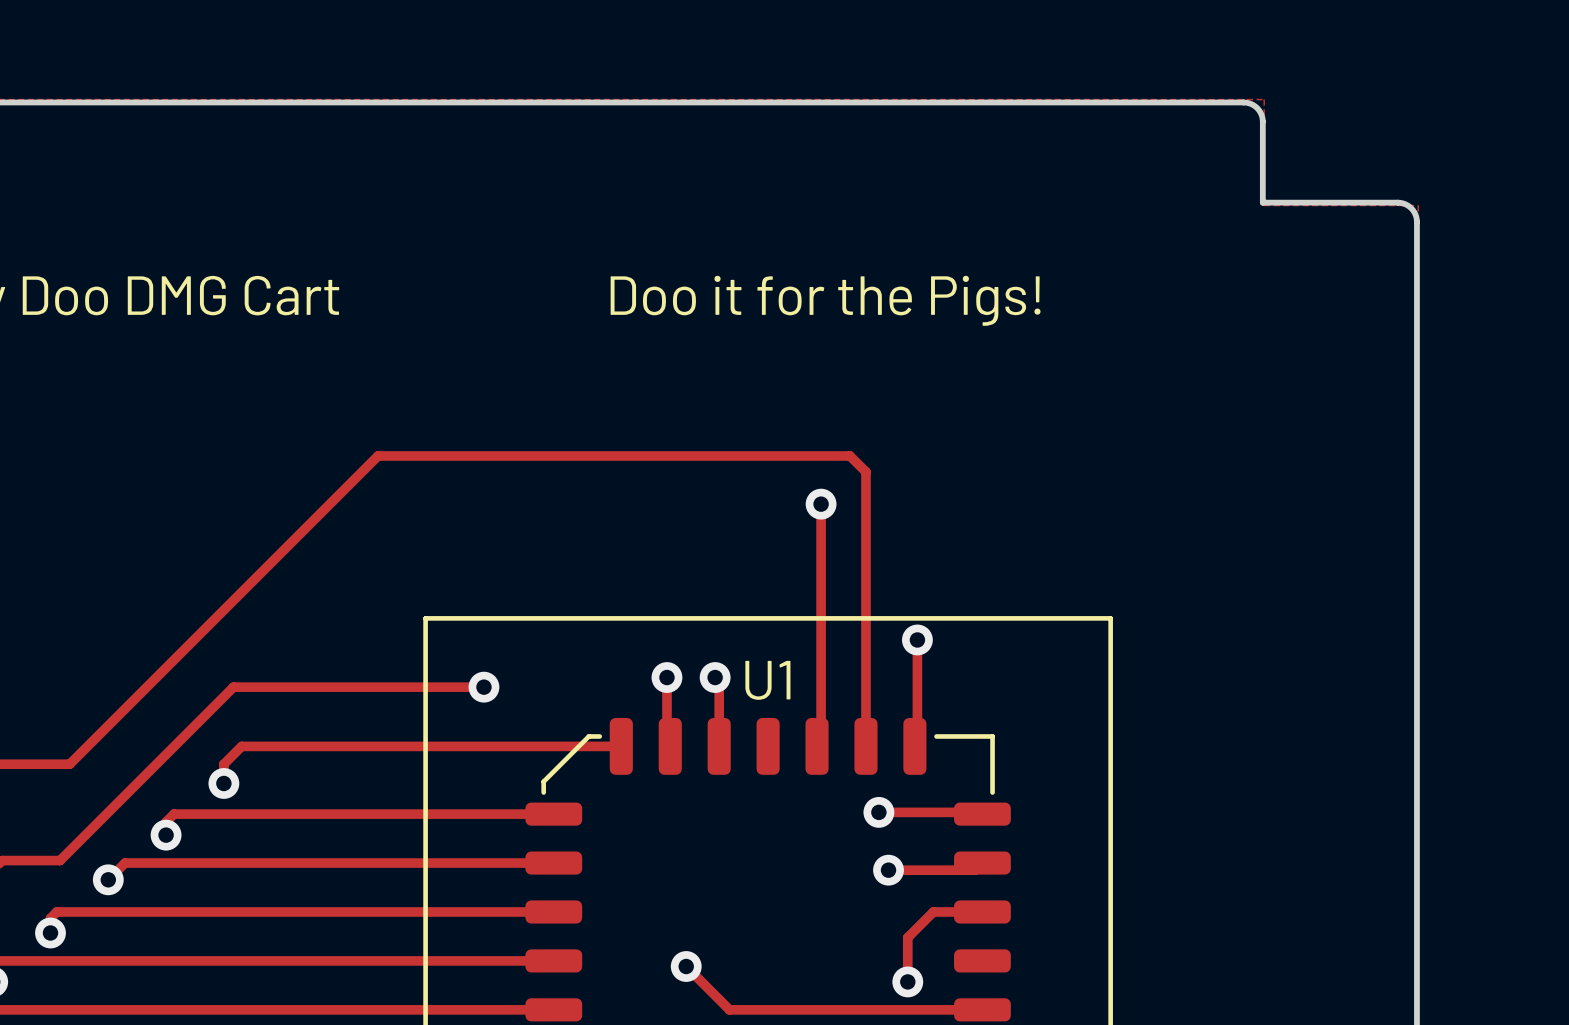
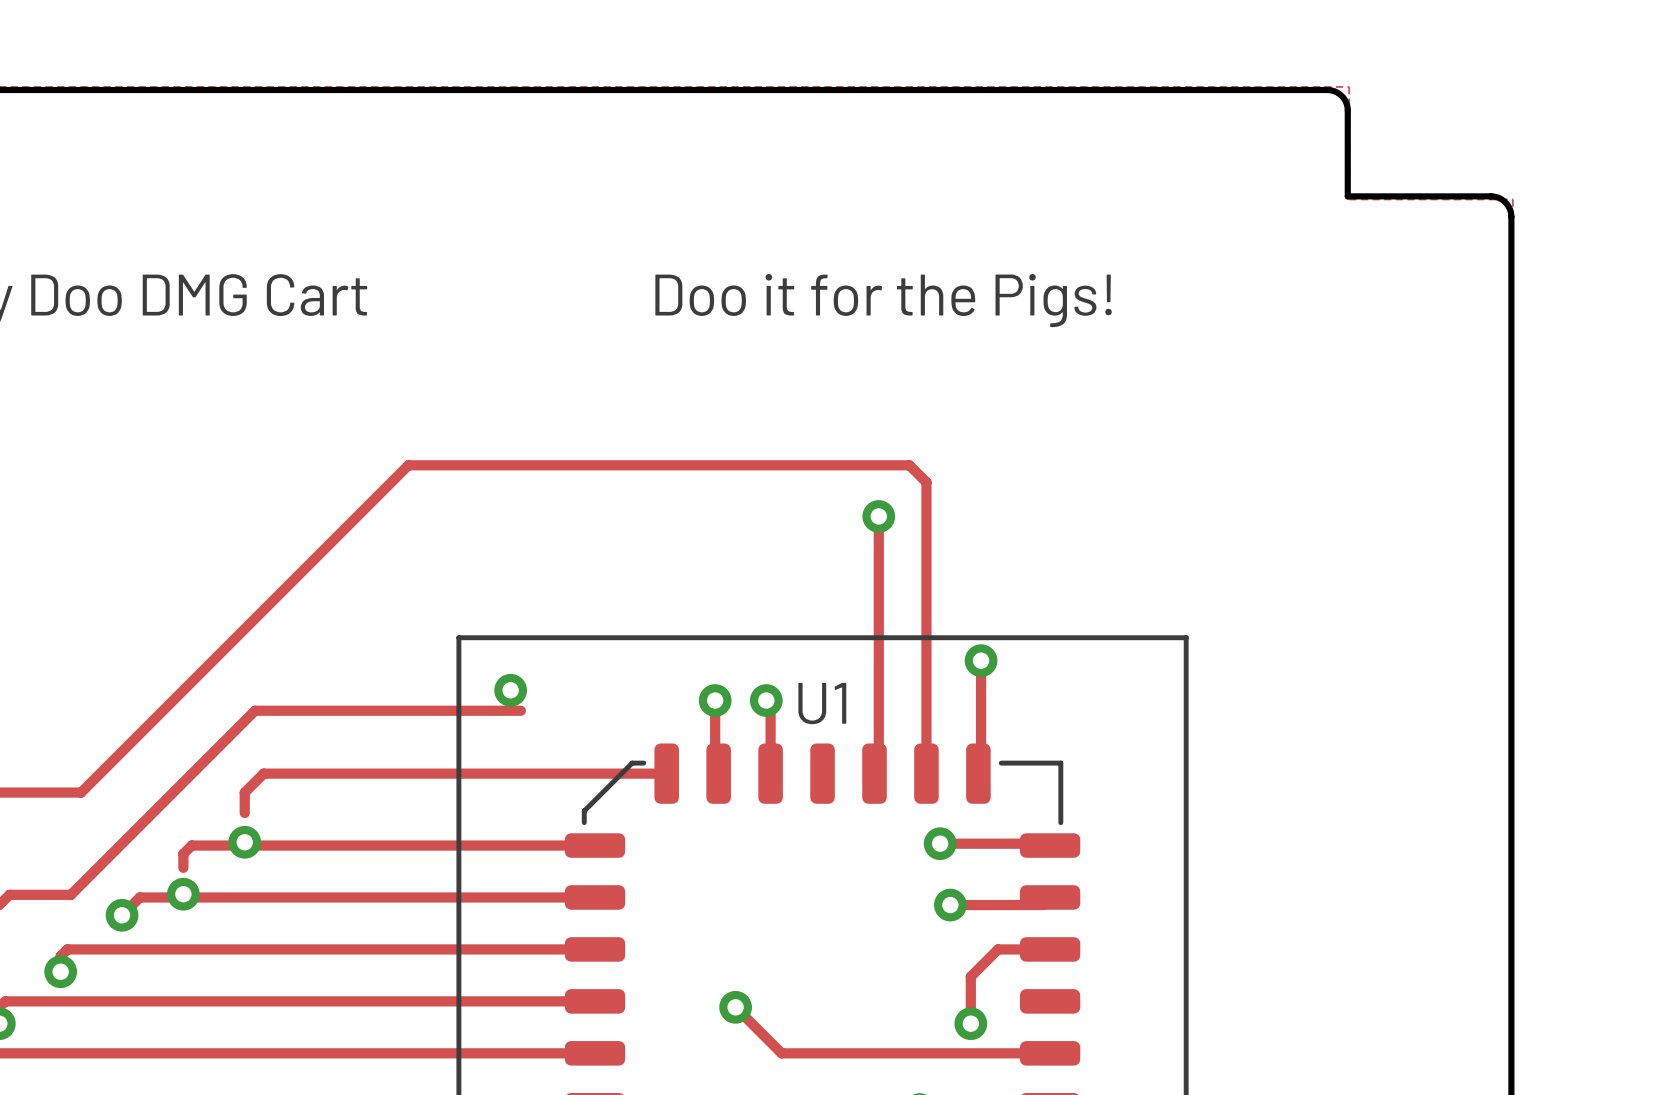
via position: (483, 687) -> (510, 690)
via position: (223, 783) -> (244, 842)
via position: (166, 835) -> (183, 894)

